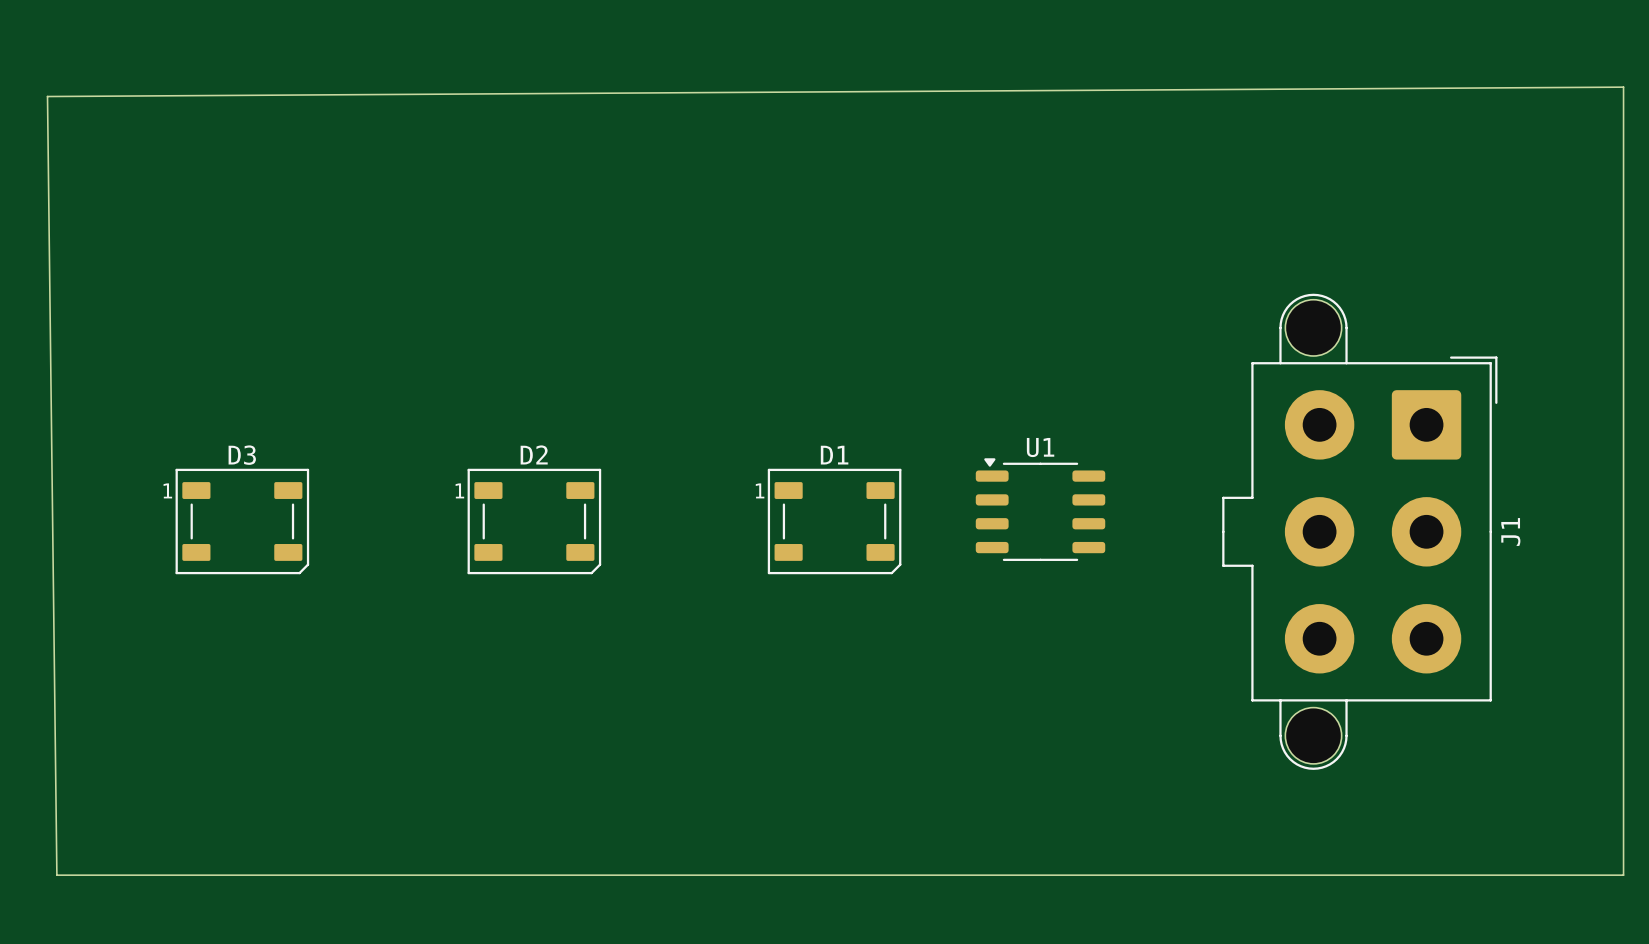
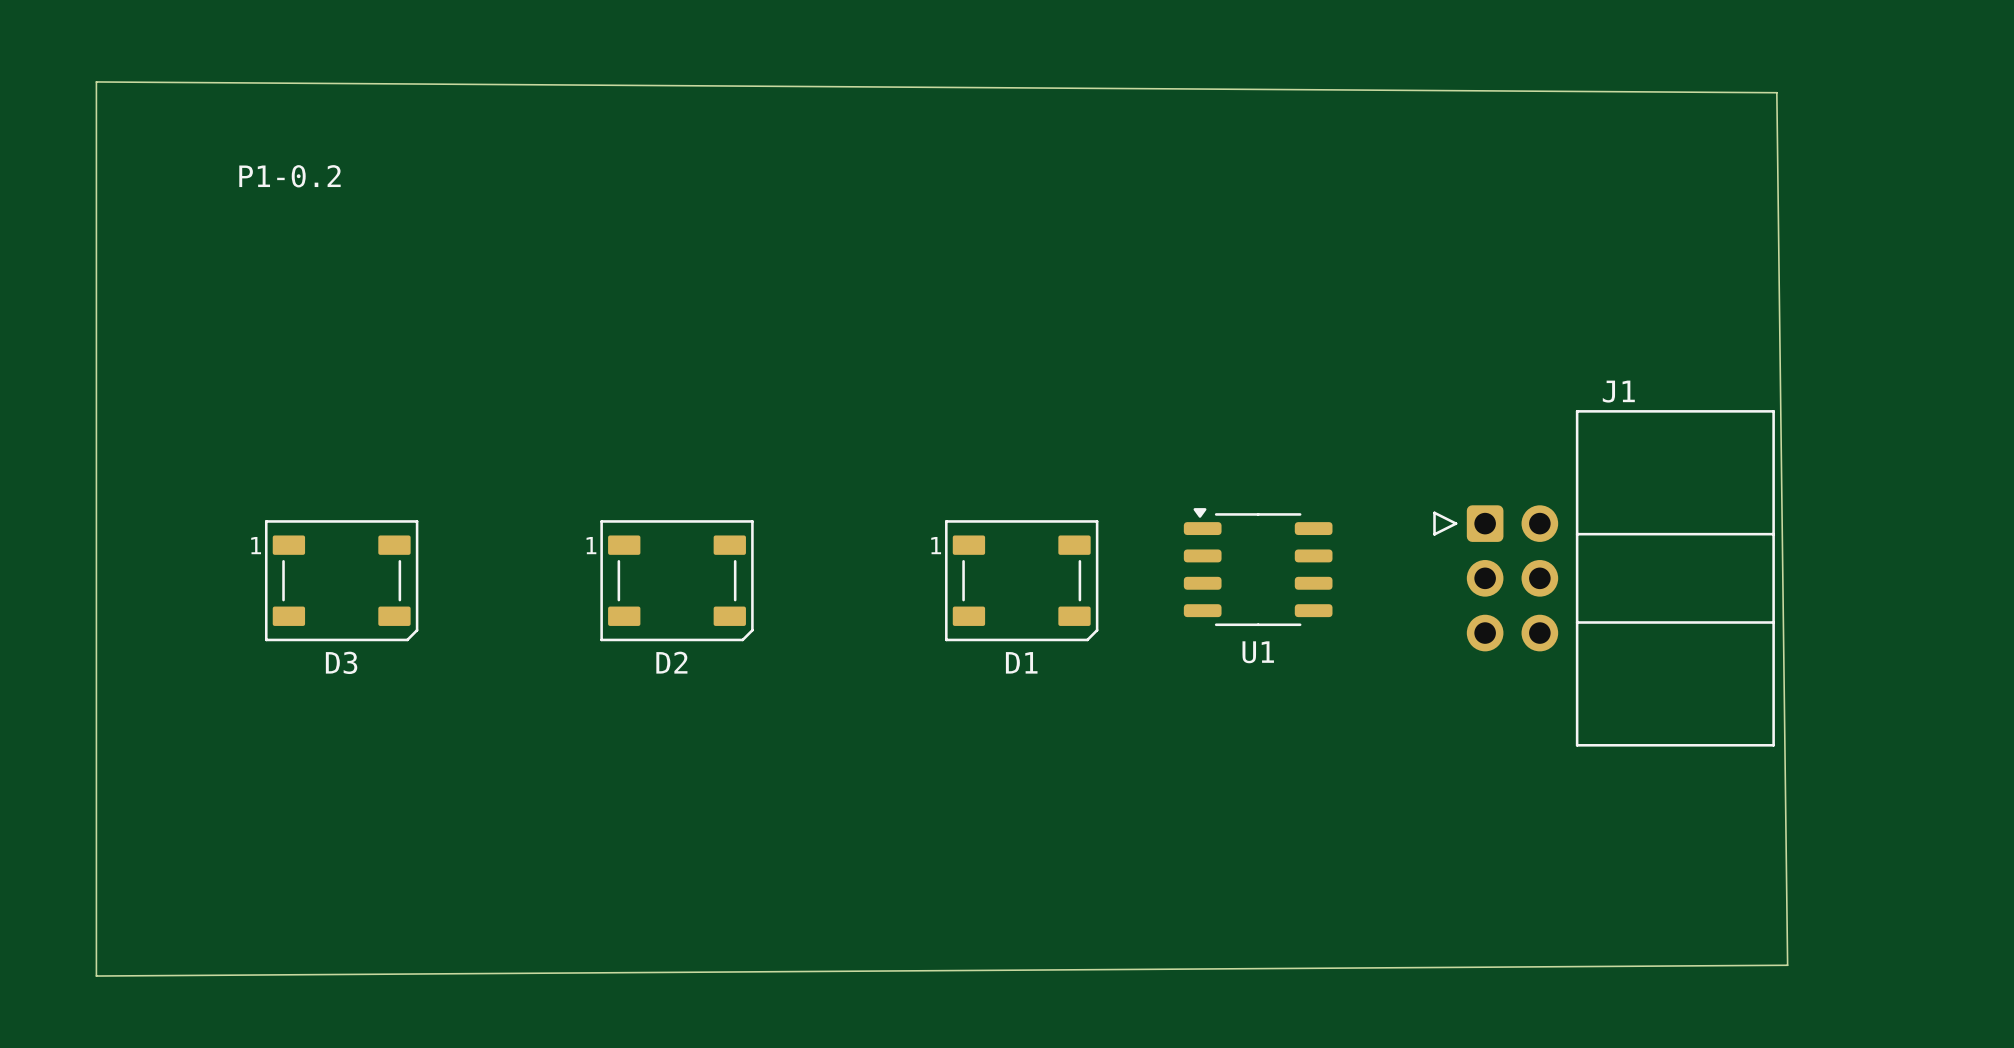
board edge: (1623, 87) (47, 96) (56, 875) (1623, 875) (1623, 87) -> (96, 81) (96, 976) (1787, 965) (1776, 92) (96, 81)
text: none -> P1-0.2 (289, 176)
J1 footprint: [1222, 293, 1498, 770] -> [1433, 410, 1775, 747]
U1 name position: U1 (1040, 447) -> U1 (1258, 652)
D2 name position: D2 (534, 454) -> D2 (671, 662)
D3 name position: D3 (242, 455) -> D3 (341, 662)
D1 name position: D1 (834, 455) -> D1 (1021, 662)
J1 name position: J1 (1510, 531) -> J1 (1618, 391)

